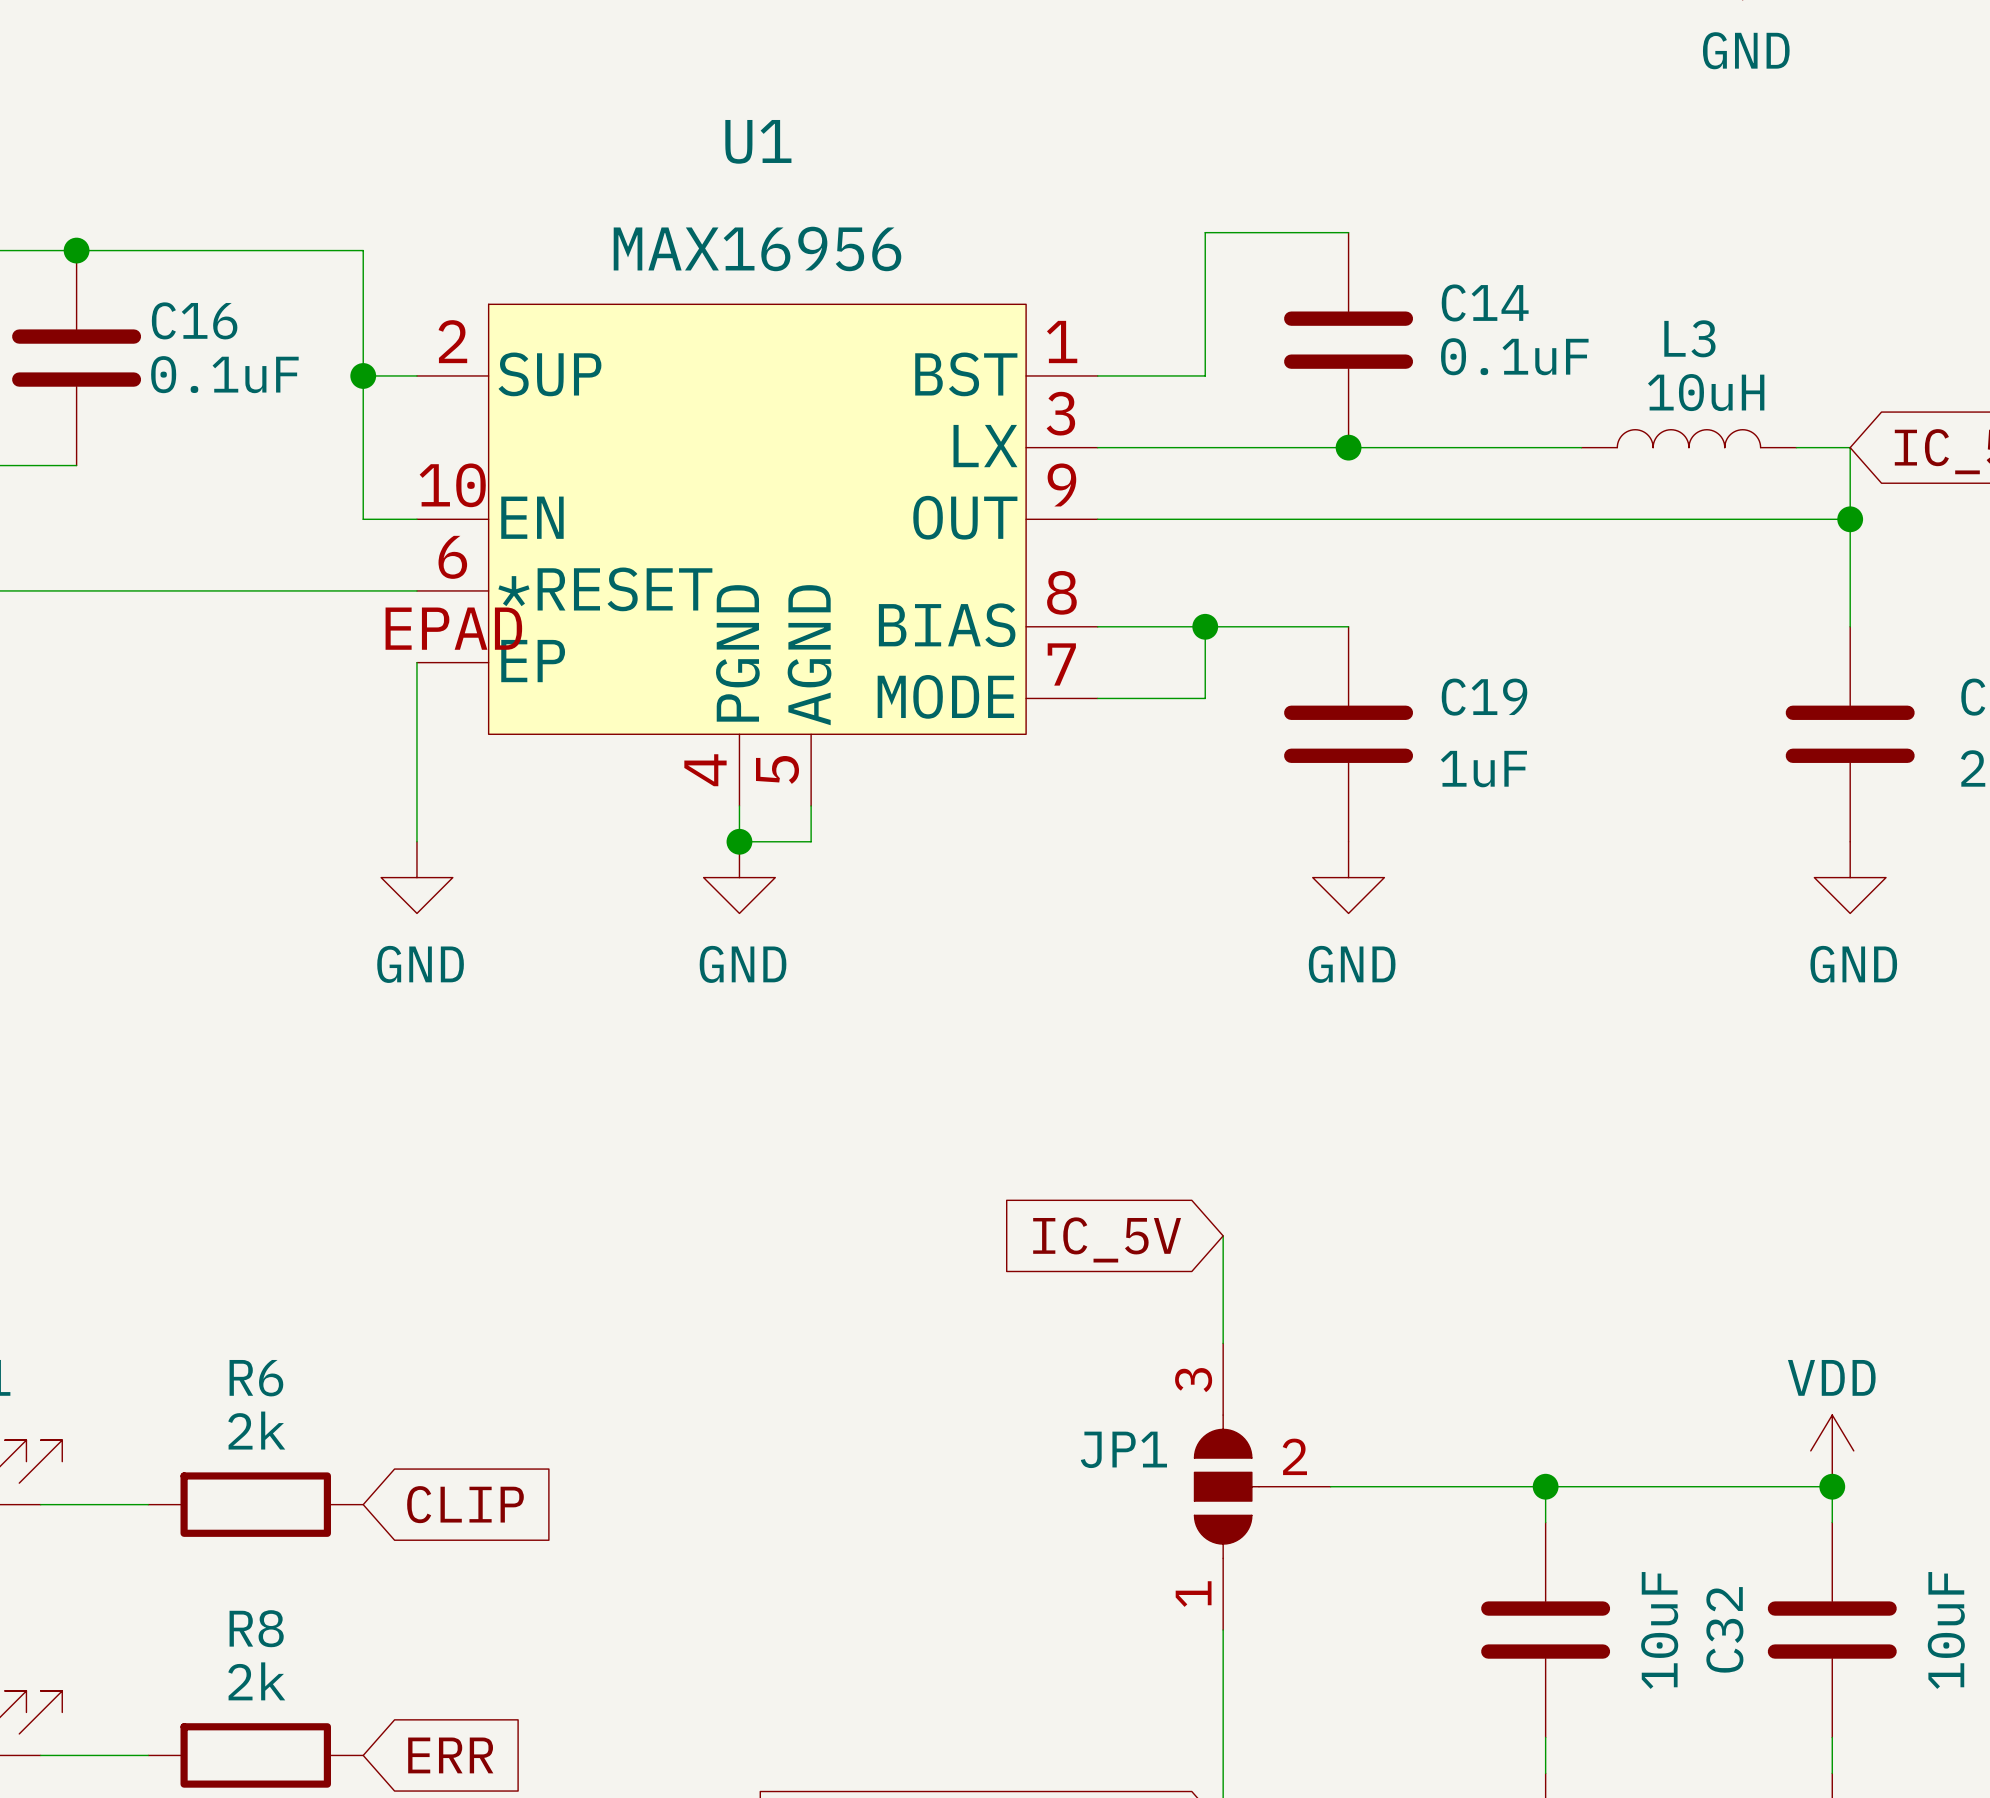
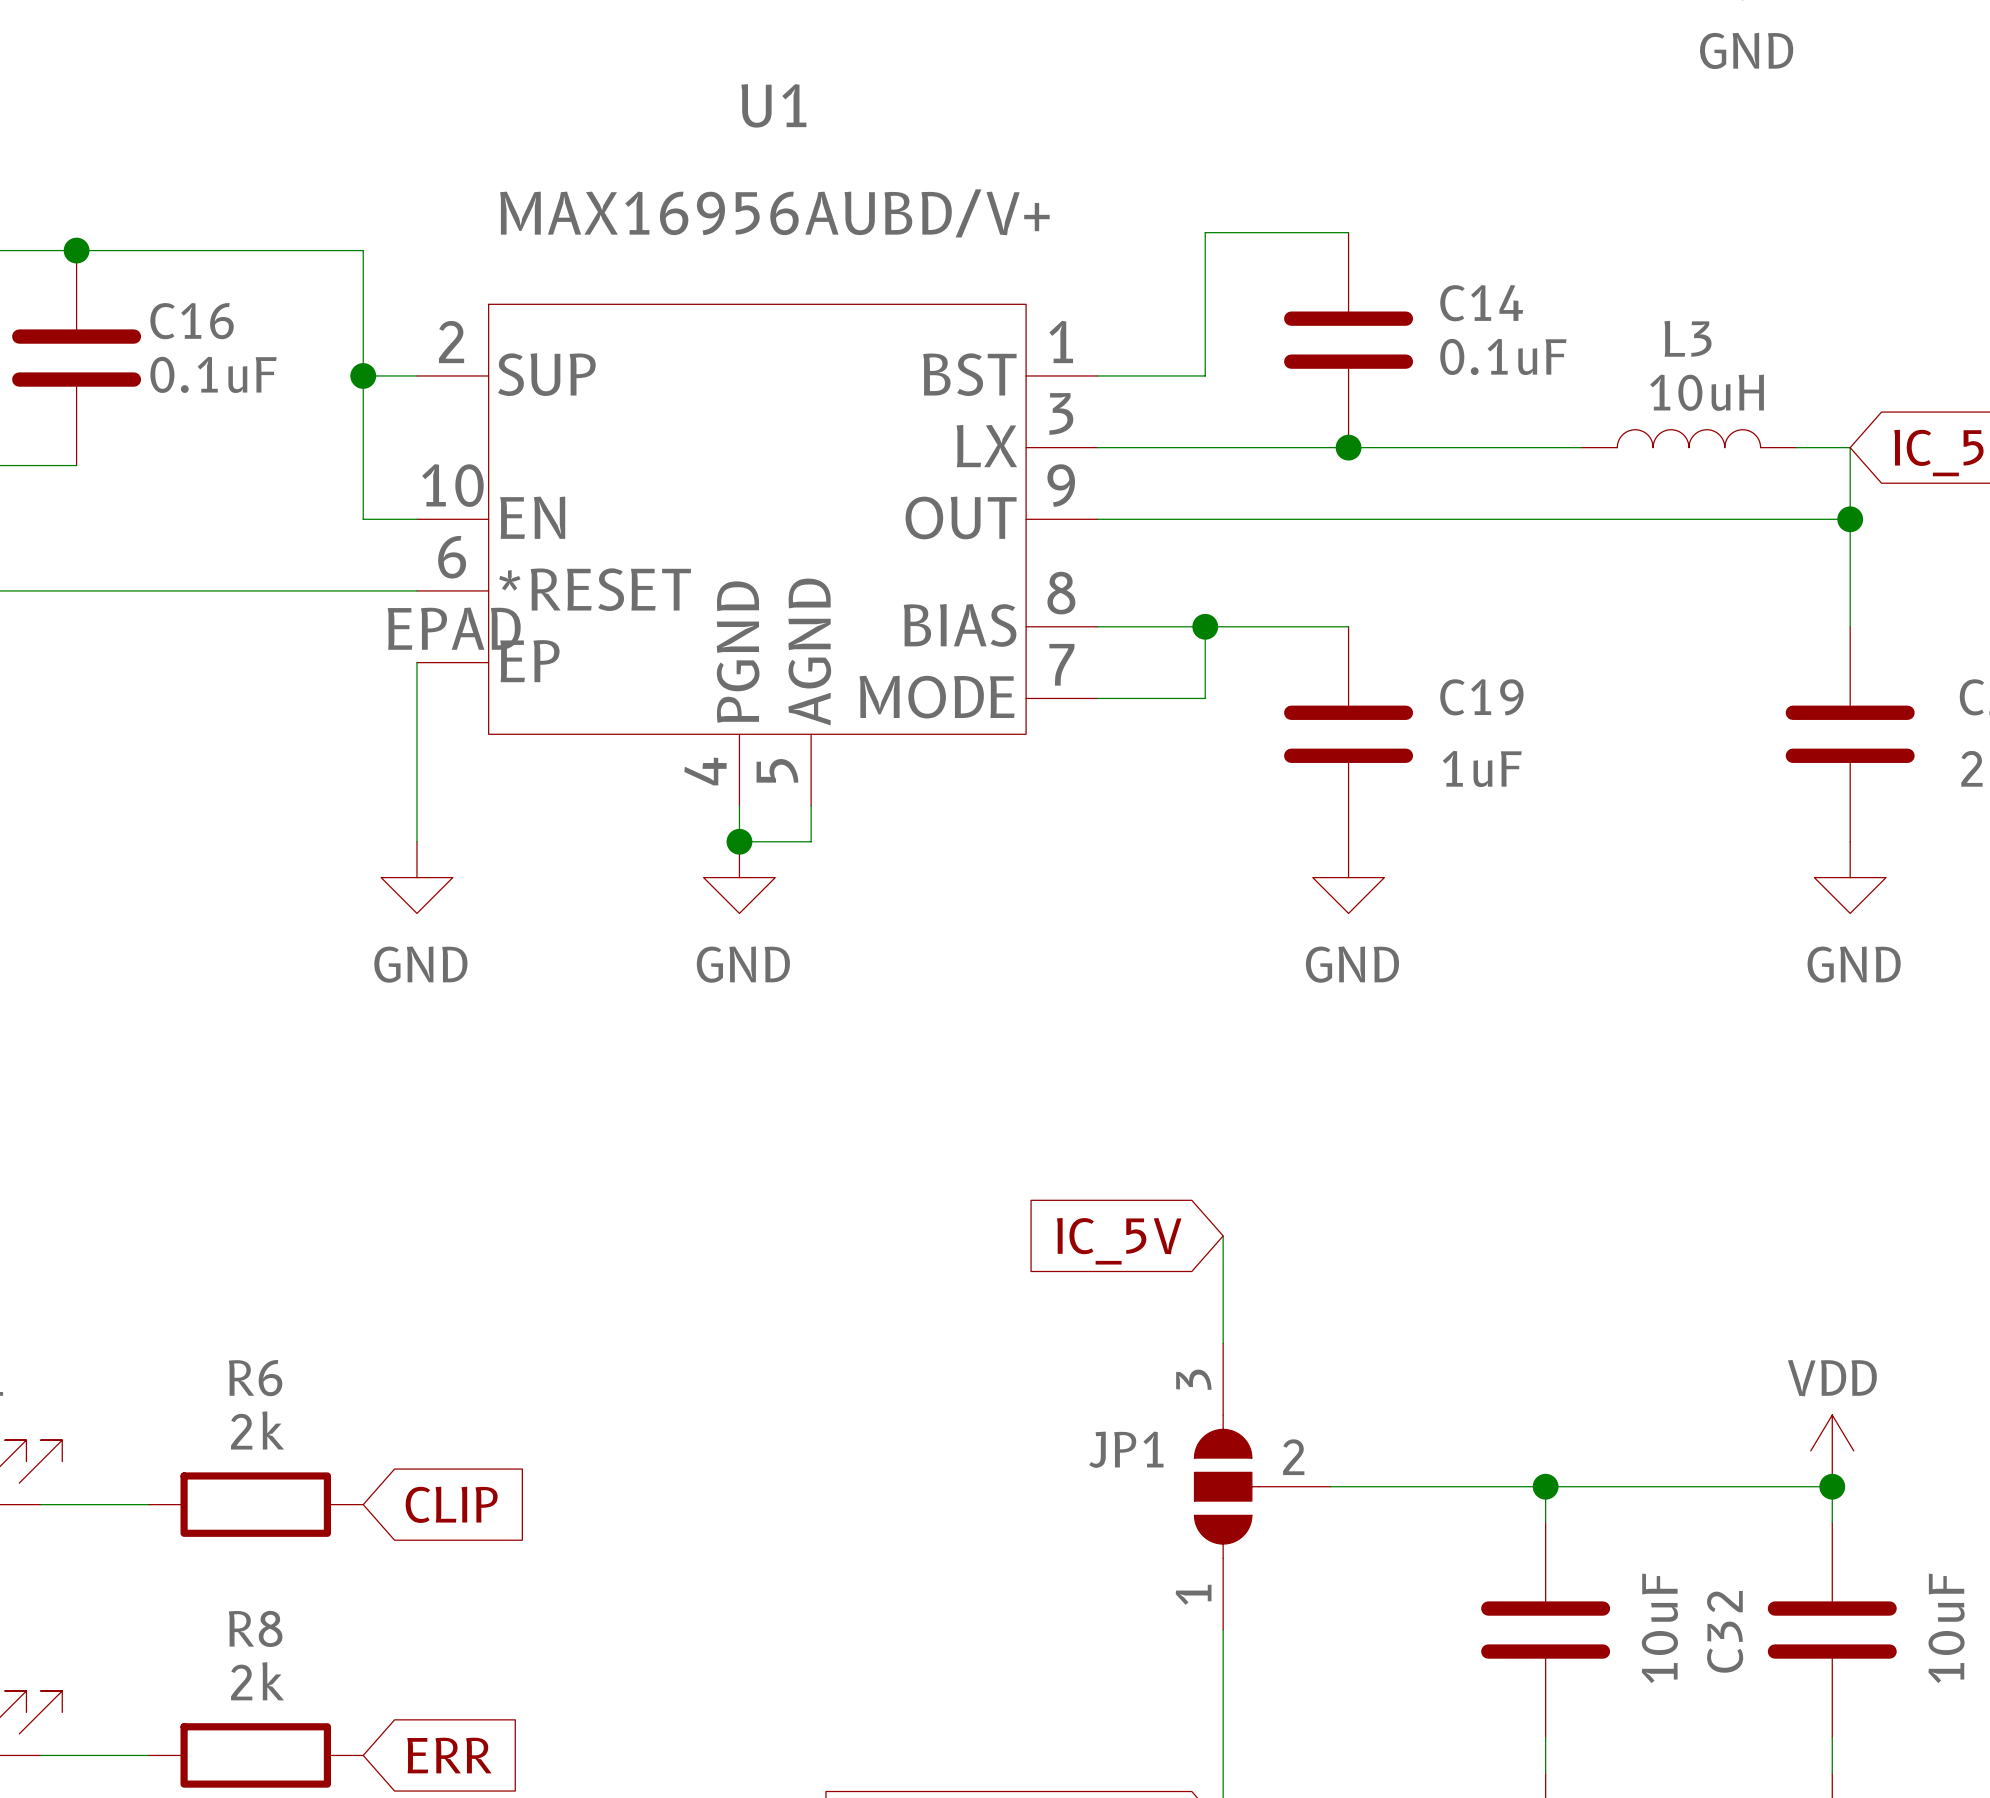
U1 name position: U1 (758, 141) -> U1 (773, 105)
U1 value: MAX16956 (757, 248) -> MAX16956AUBD/V+ (774, 213)

